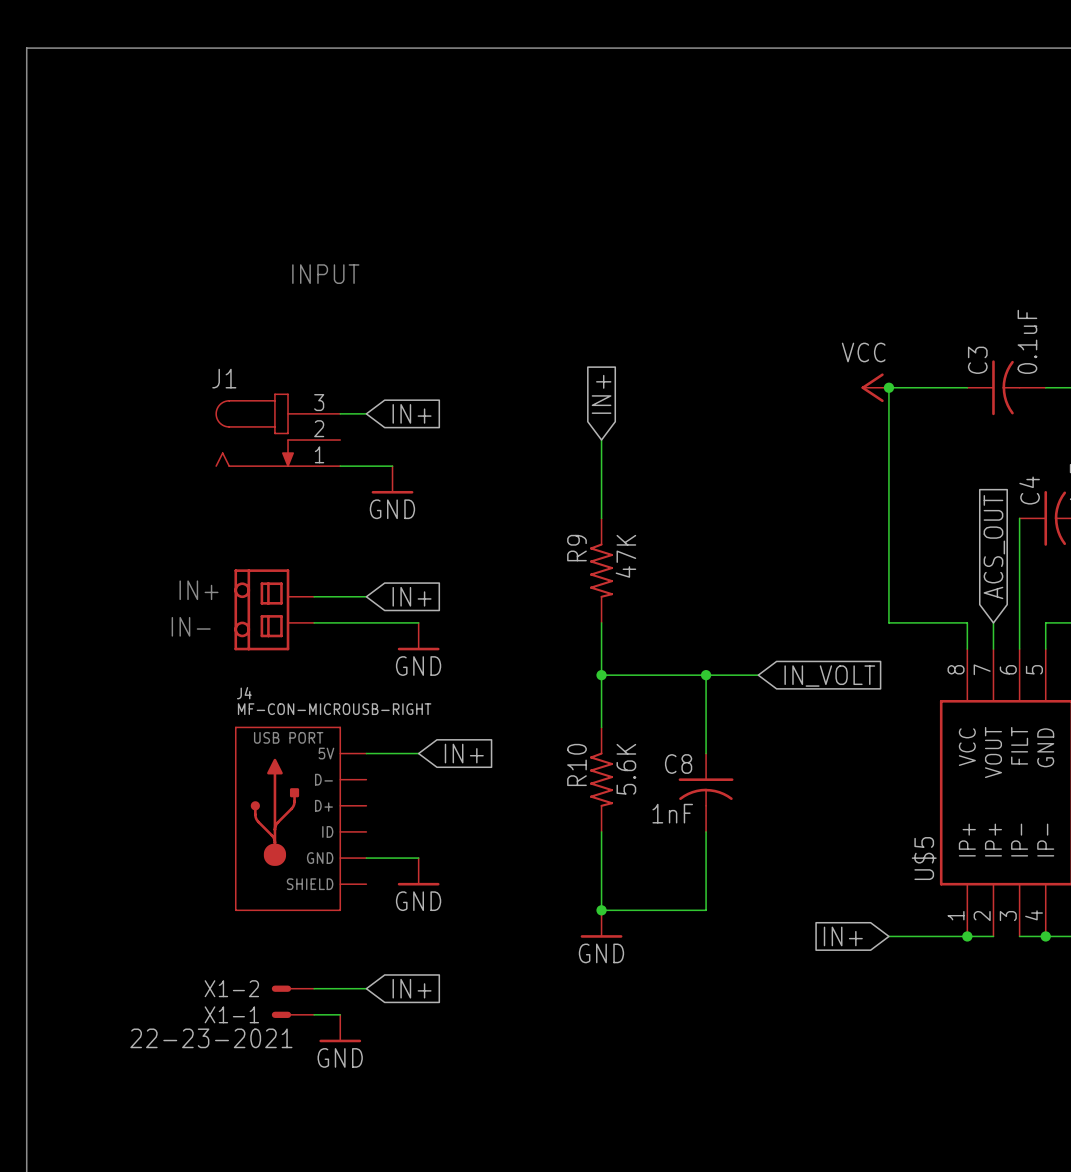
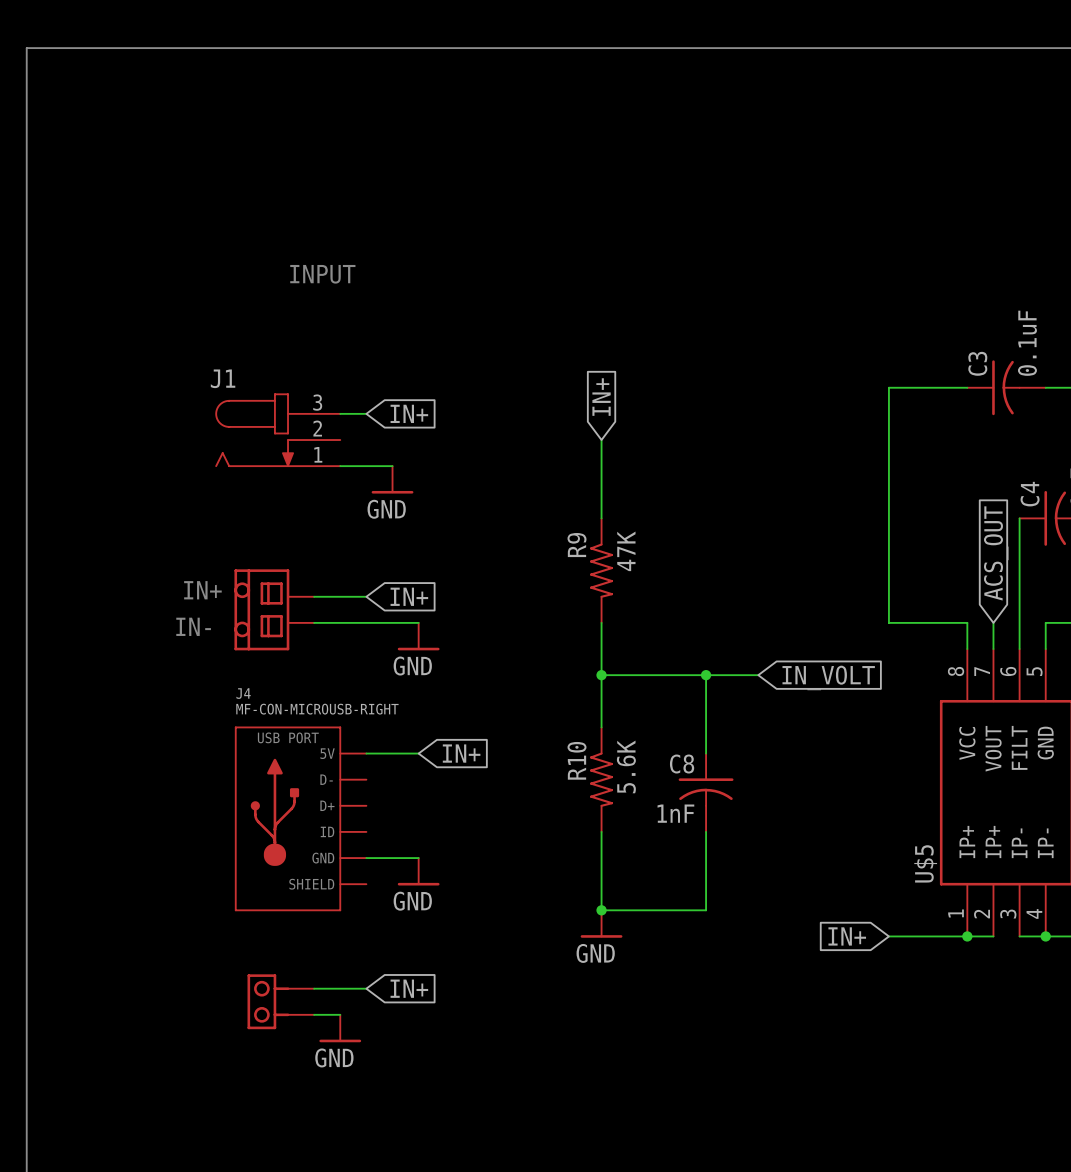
power symbol: VCC (875, 387) -> none
junction: (888, 387) -> none
X1-2: (292, 988) -> none
part: none -> (280, 1001)
X1-1: 22-23-2021 (292, 1014) -> none

